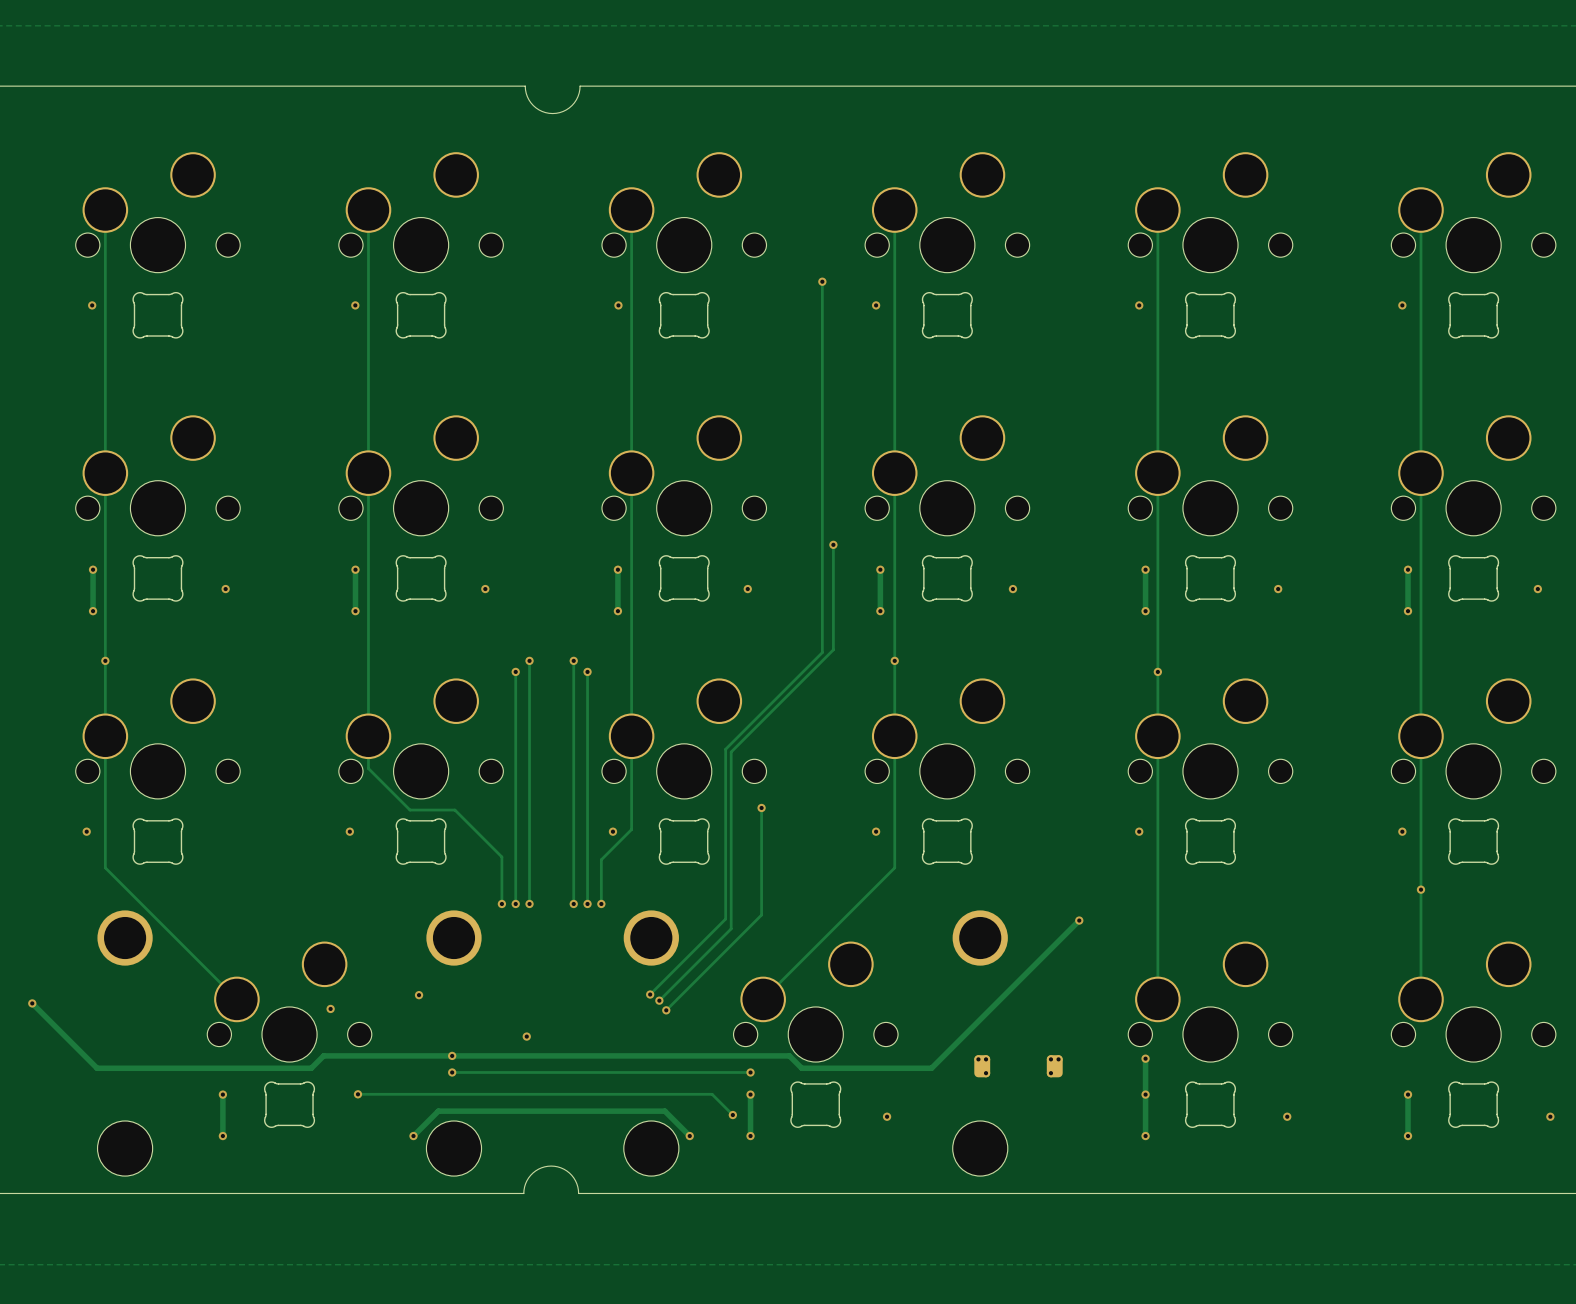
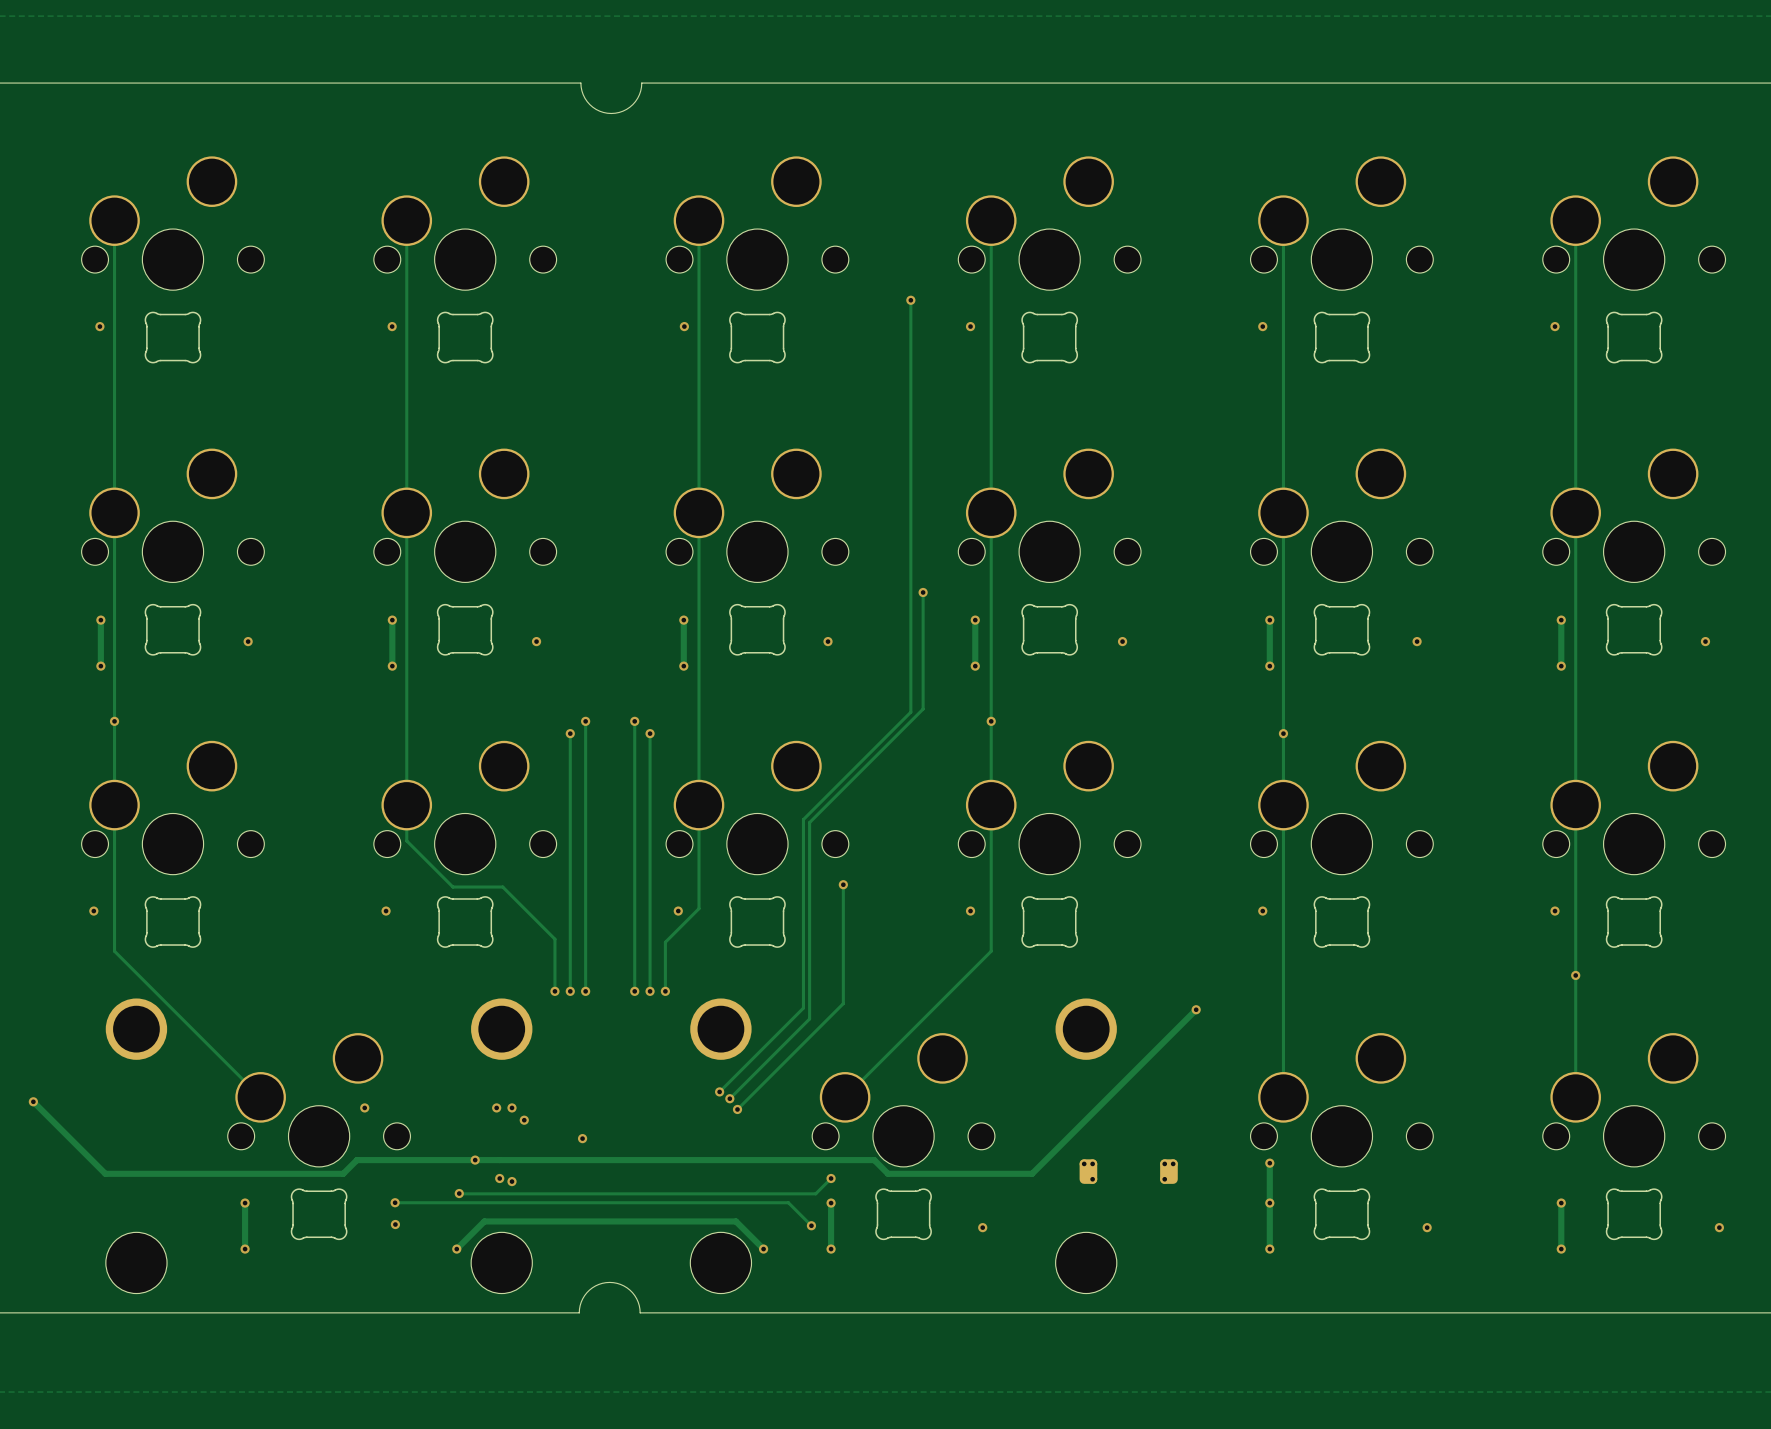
via: (419, 995) -> none
via: none -> (496, 1107)
via: none -> (512, 1107)
via: none -> (524, 1120)
via: none -> (475, 1160)
via: (452, 1055) -> none
track: (452, 1072) (750, 1072) -> (459, 1193) (815, 1193) (831, 1178)
via: none -> (512, 1181)
via: none -> (459, 1193)
via: none -> (395, 1224)

